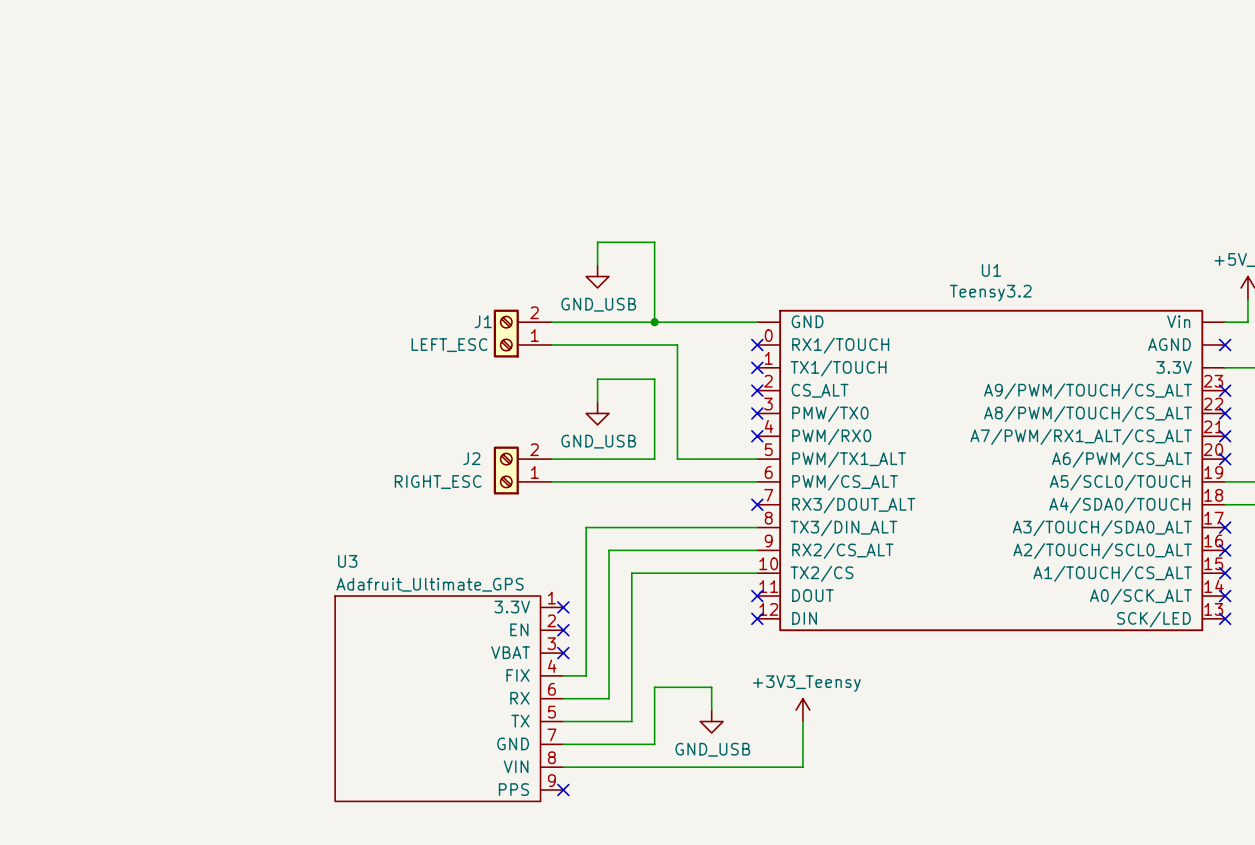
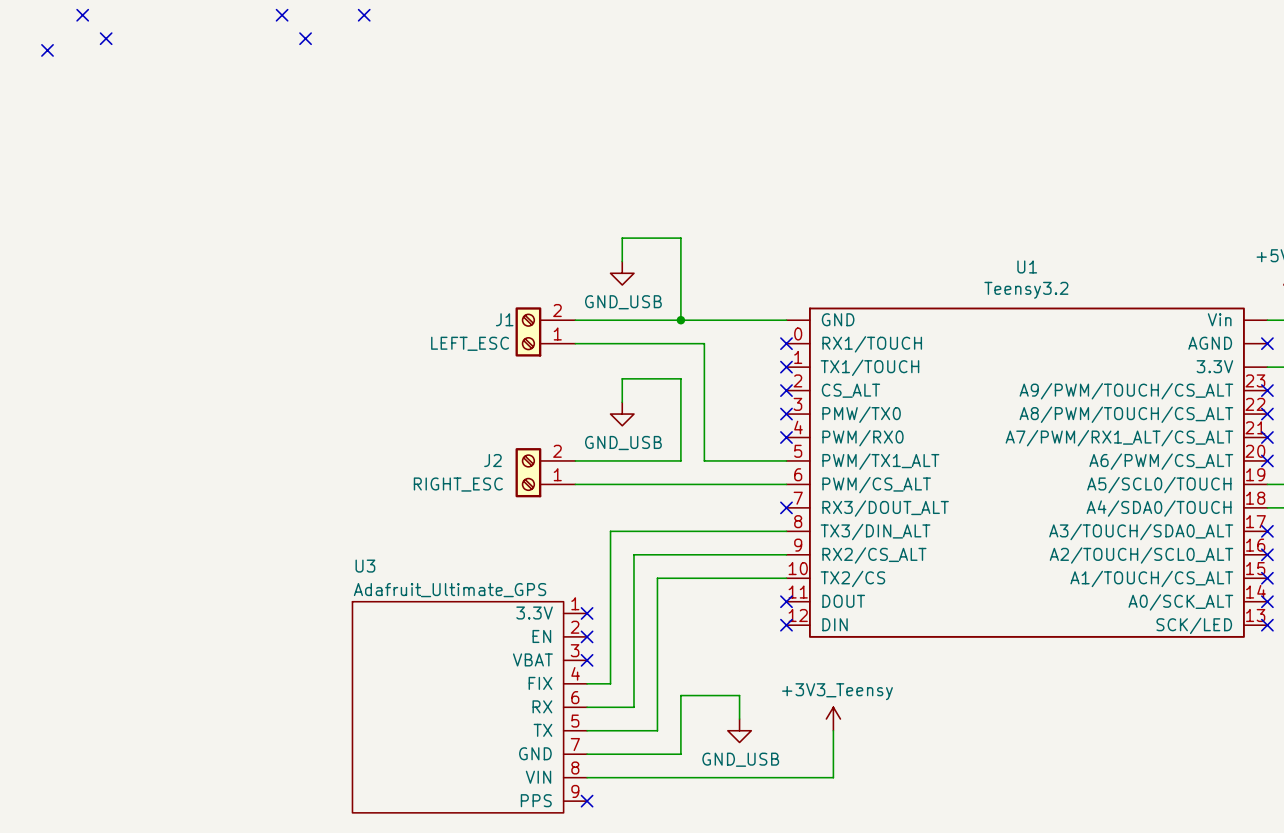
no-connect mark: none -> (82, 15)
no-connect mark: none -> (282, 15)
no-connect mark: none -> (364, 15)
no-connect mark: none -> (106, 38)
no-connect mark: none -> (305, 38)
no-connect mark: none -> (47, 50)

